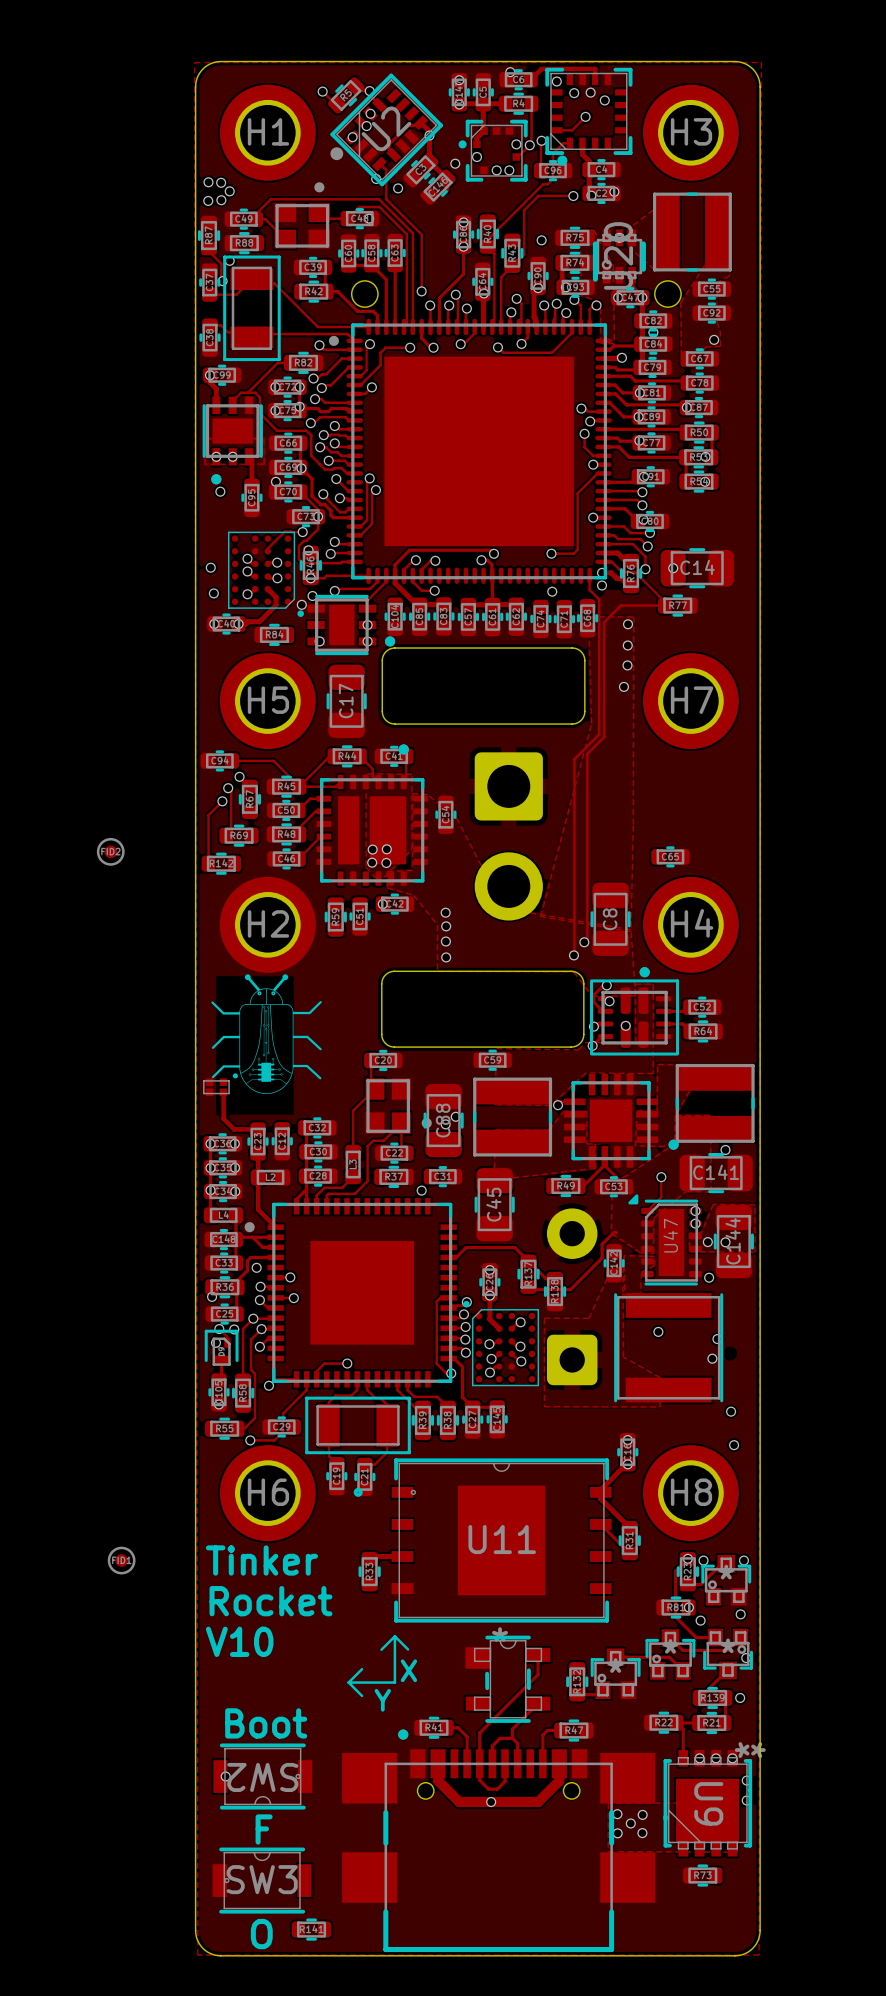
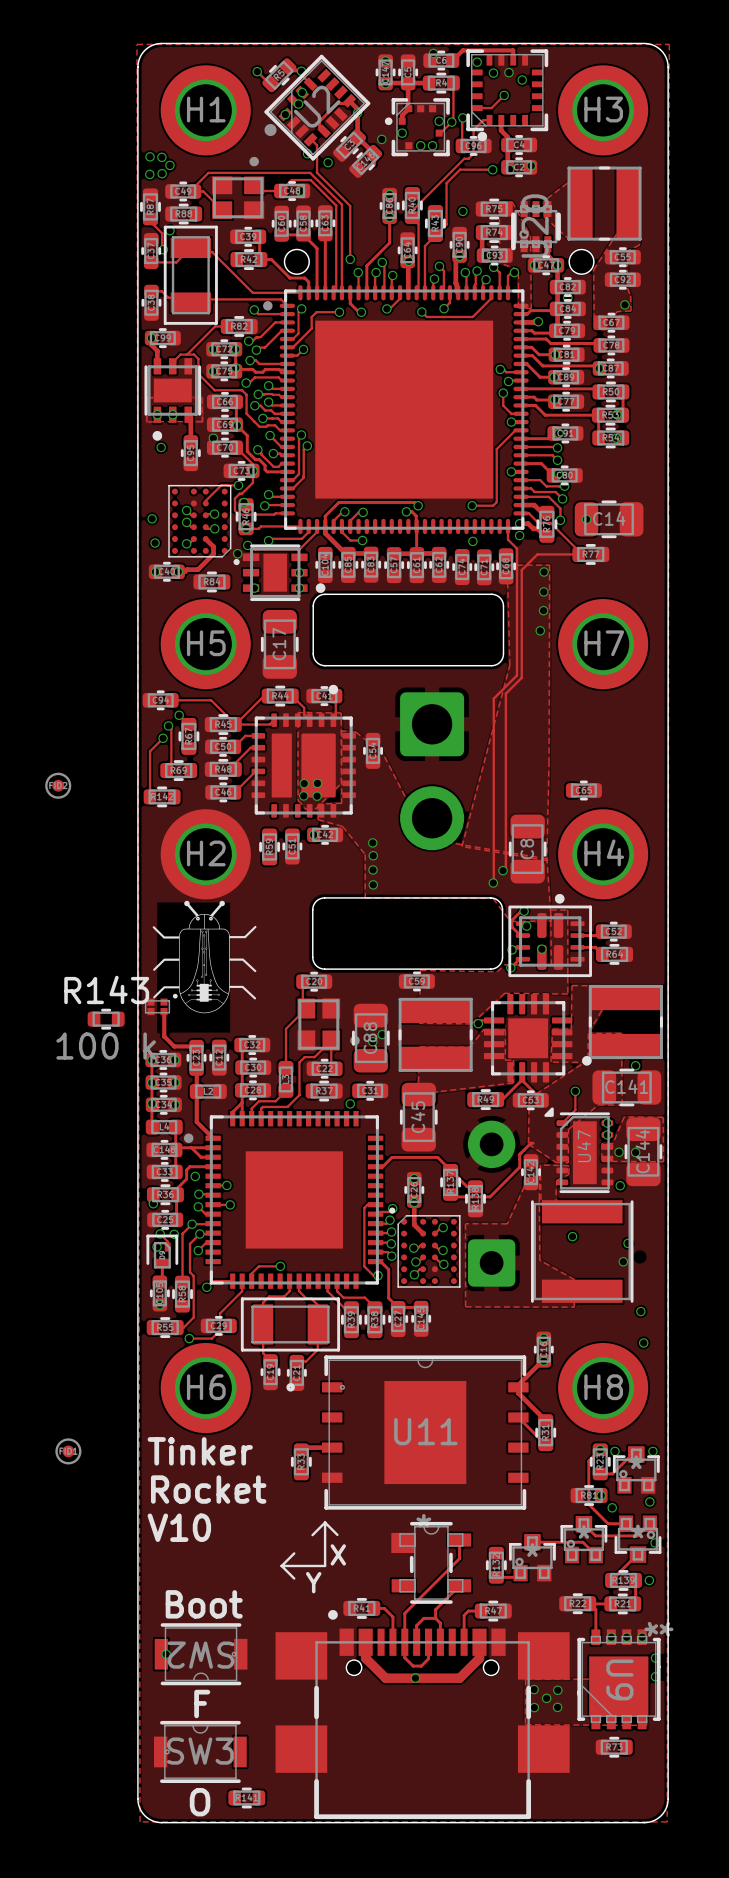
R143: none -> 100 k (106, 1019)

